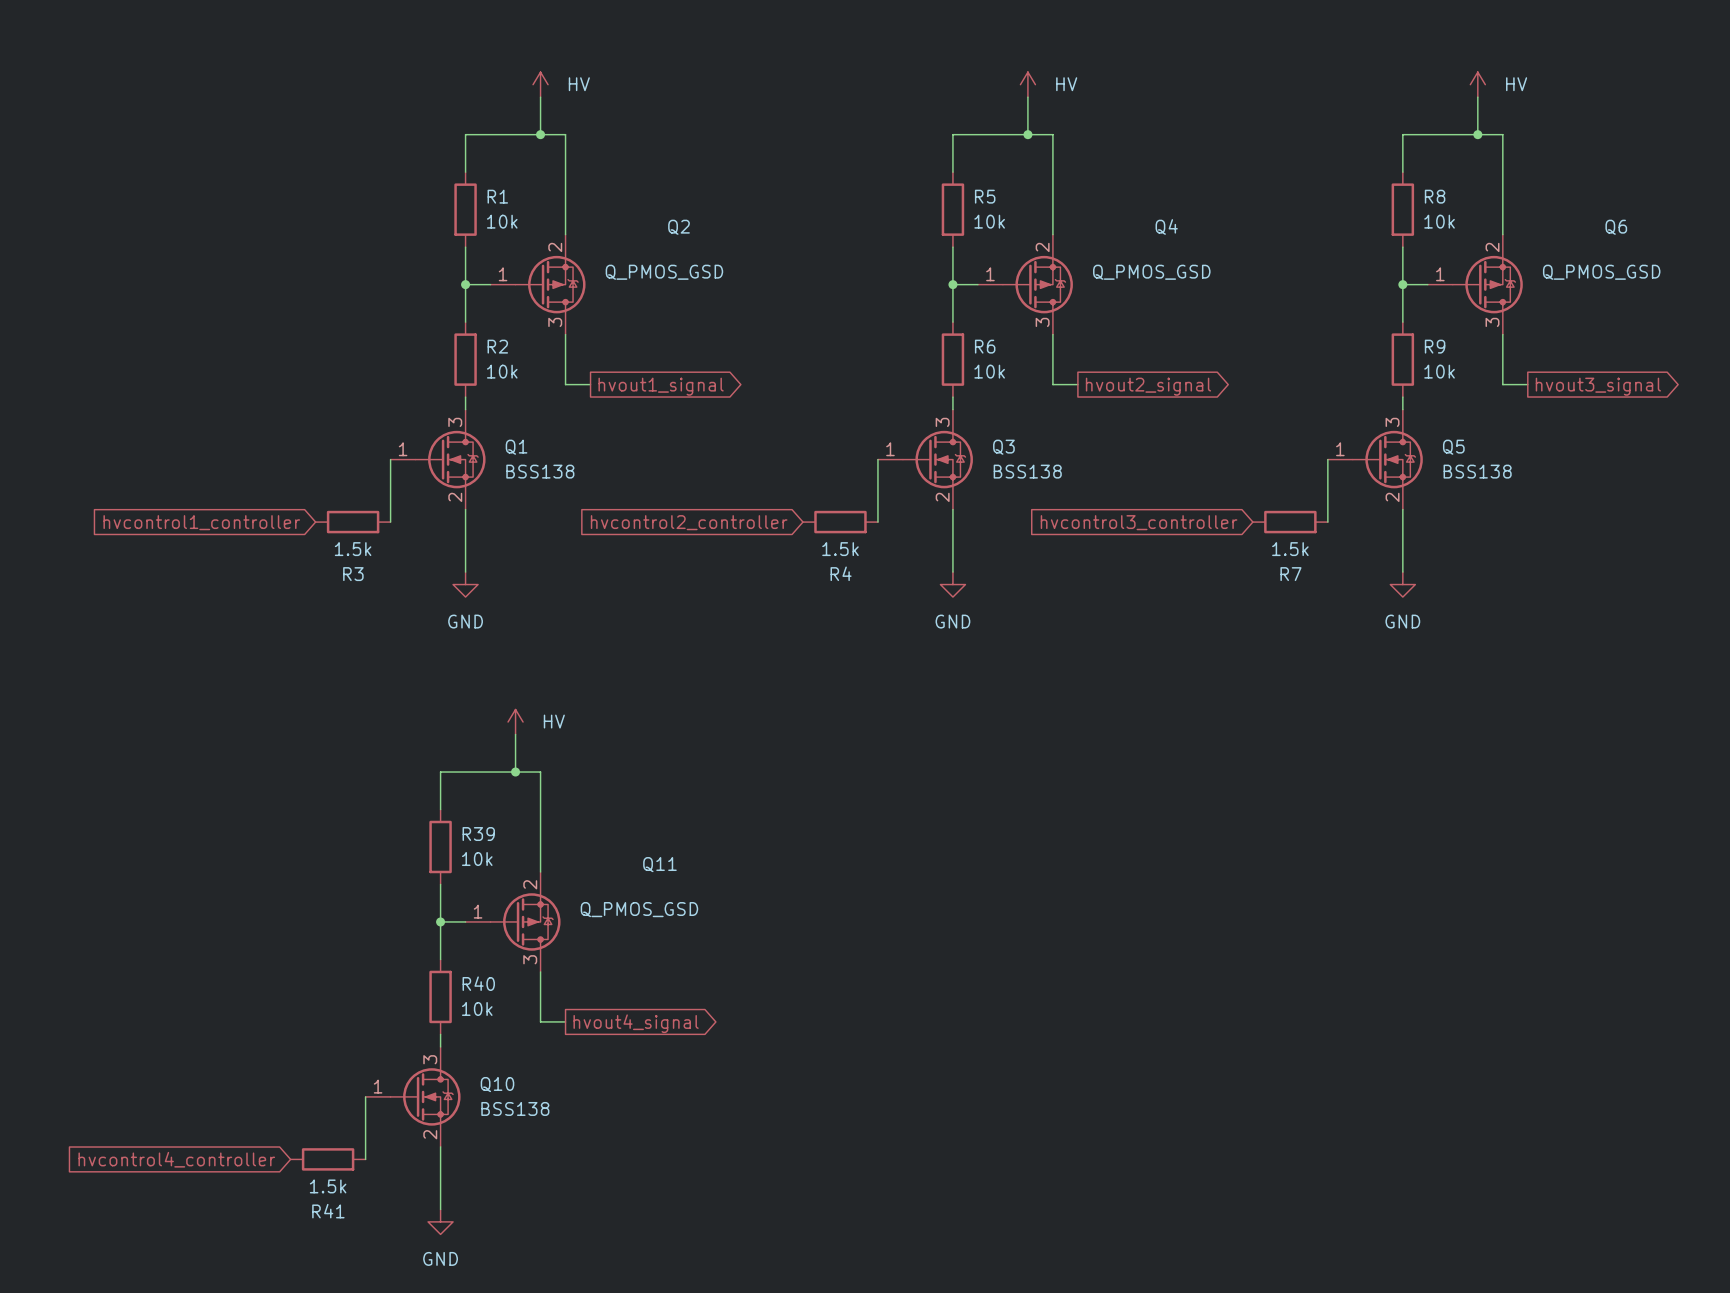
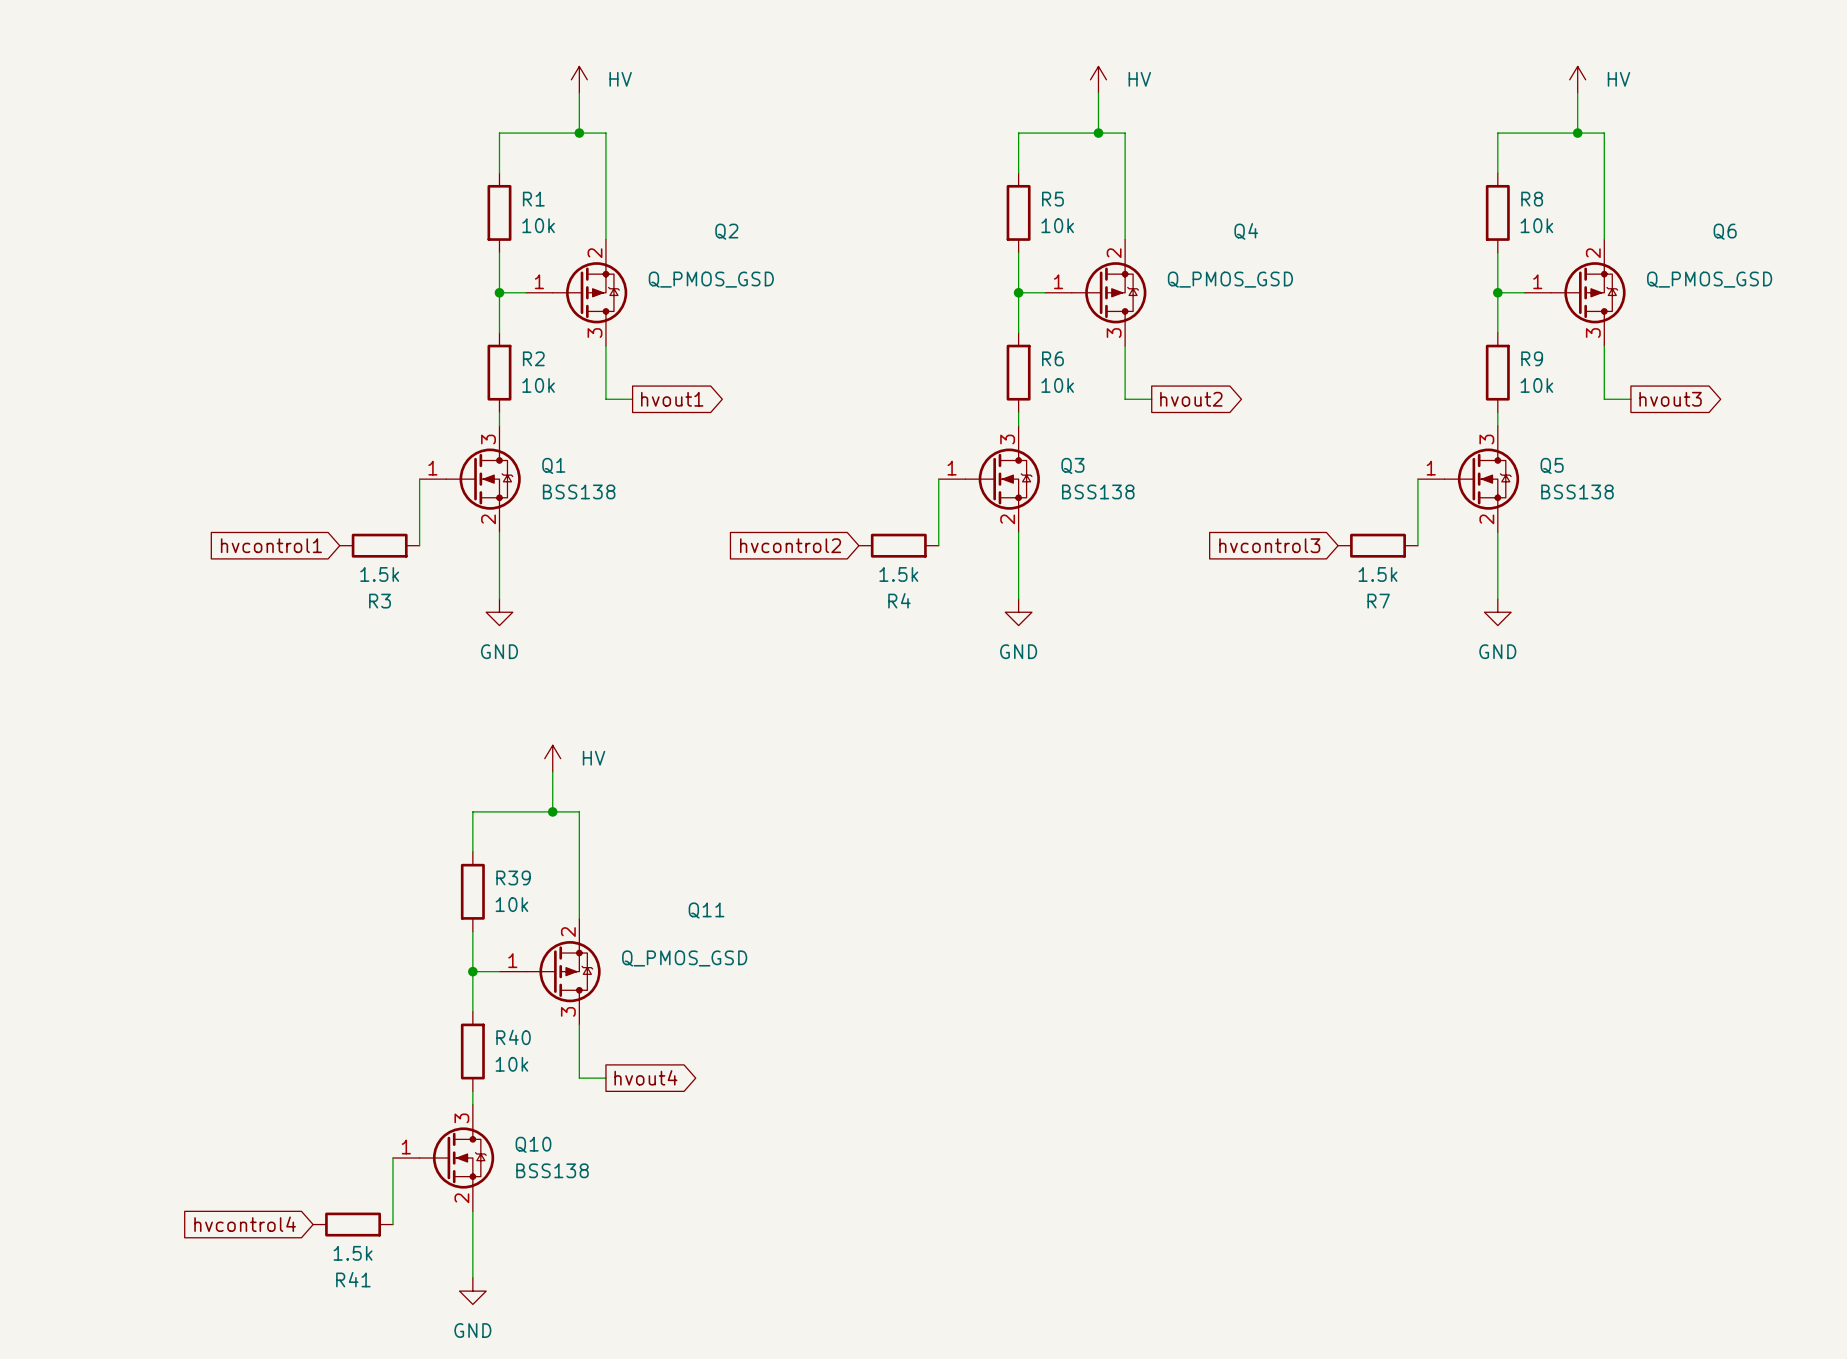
global label: hvout1_signal (661, 386) -> hvout1 (672, 399)
global label: hvout2_signal (1148, 386) -> hvout2 (1191, 399)
global label: hvout3_signal (1598, 386) -> hvout3 (1670, 399)
global label: hvcontrol1_controller (201, 522) -> hvcontrol1 (271, 545)
global label: hvcontrol2_controller (689, 522) -> hvcontrol2 (790, 545)
global label: hvcontrol3_controller (1139, 522) -> hvcontrol3 (1269, 545)
global label: hvout4_signal (636, 1023) -> hvout4 (645, 1077)
global label: hvcontrol4_controller (176, 1159) -> hvcontrol4 (245, 1224)

